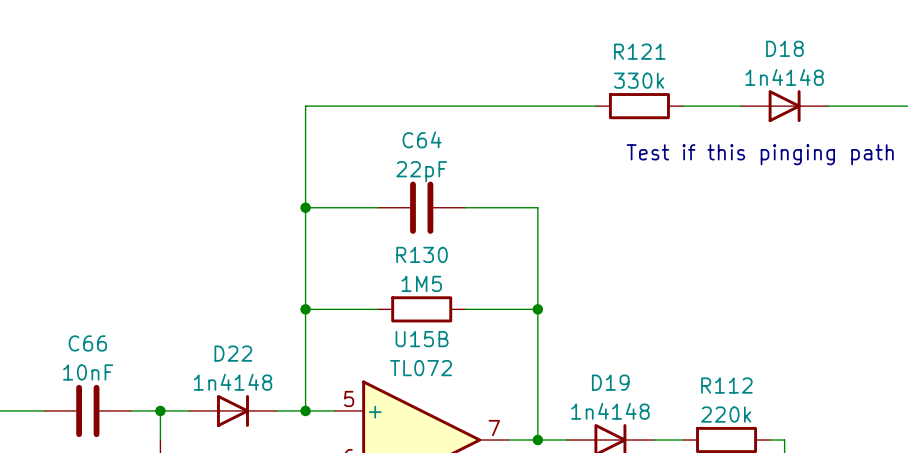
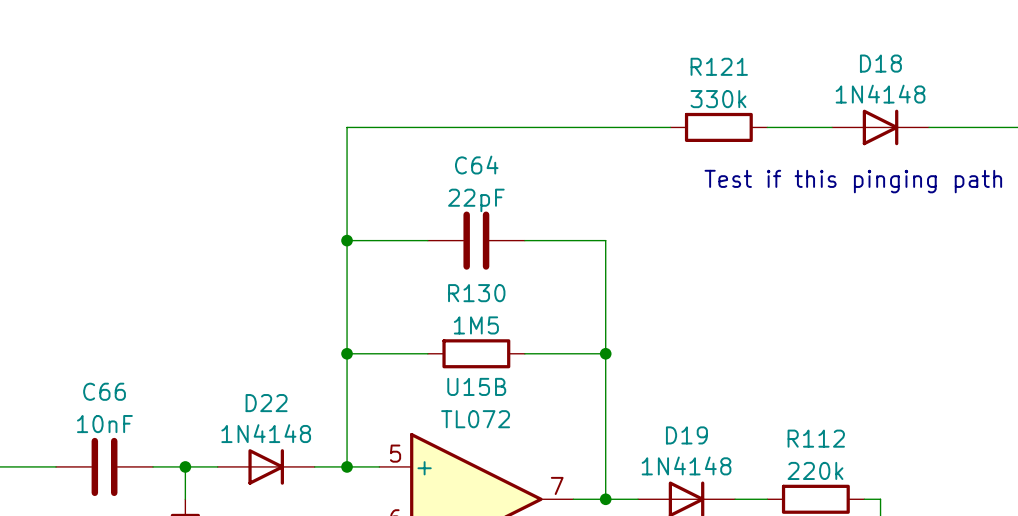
D18 value: 1n4148 (784, 77) -> 1N4148 (880, 94)
D22 value: 1n4148 (232, 382) -> 1N4148 (266, 433)
D19 value: 1n4148 (610, 411) -> 1N4148 (686, 465)

